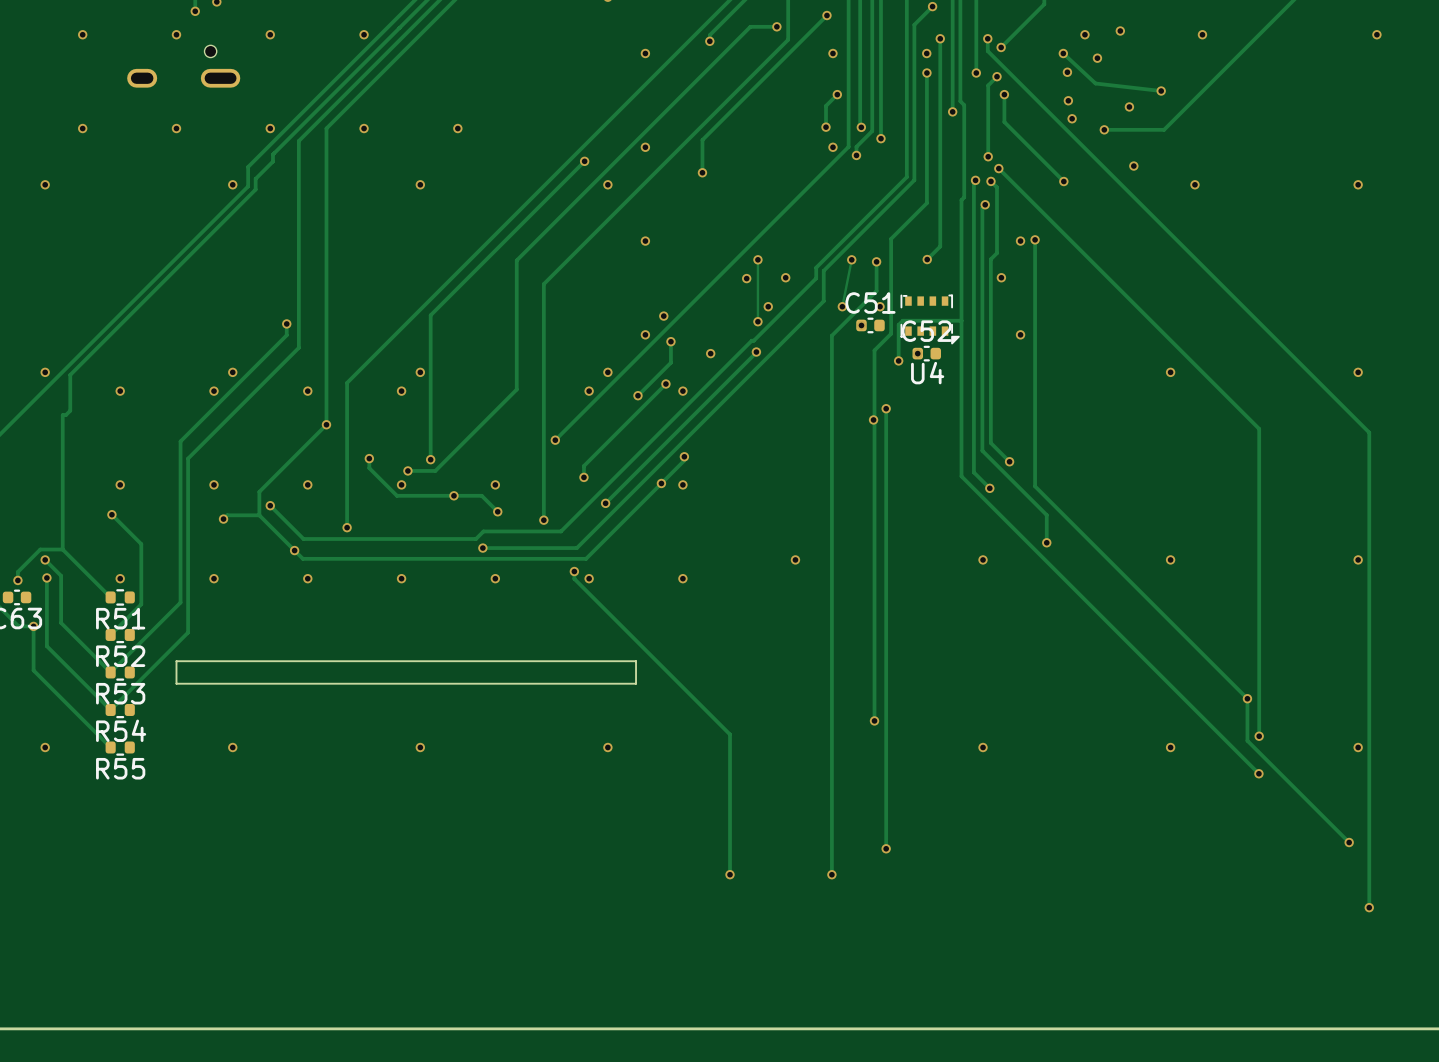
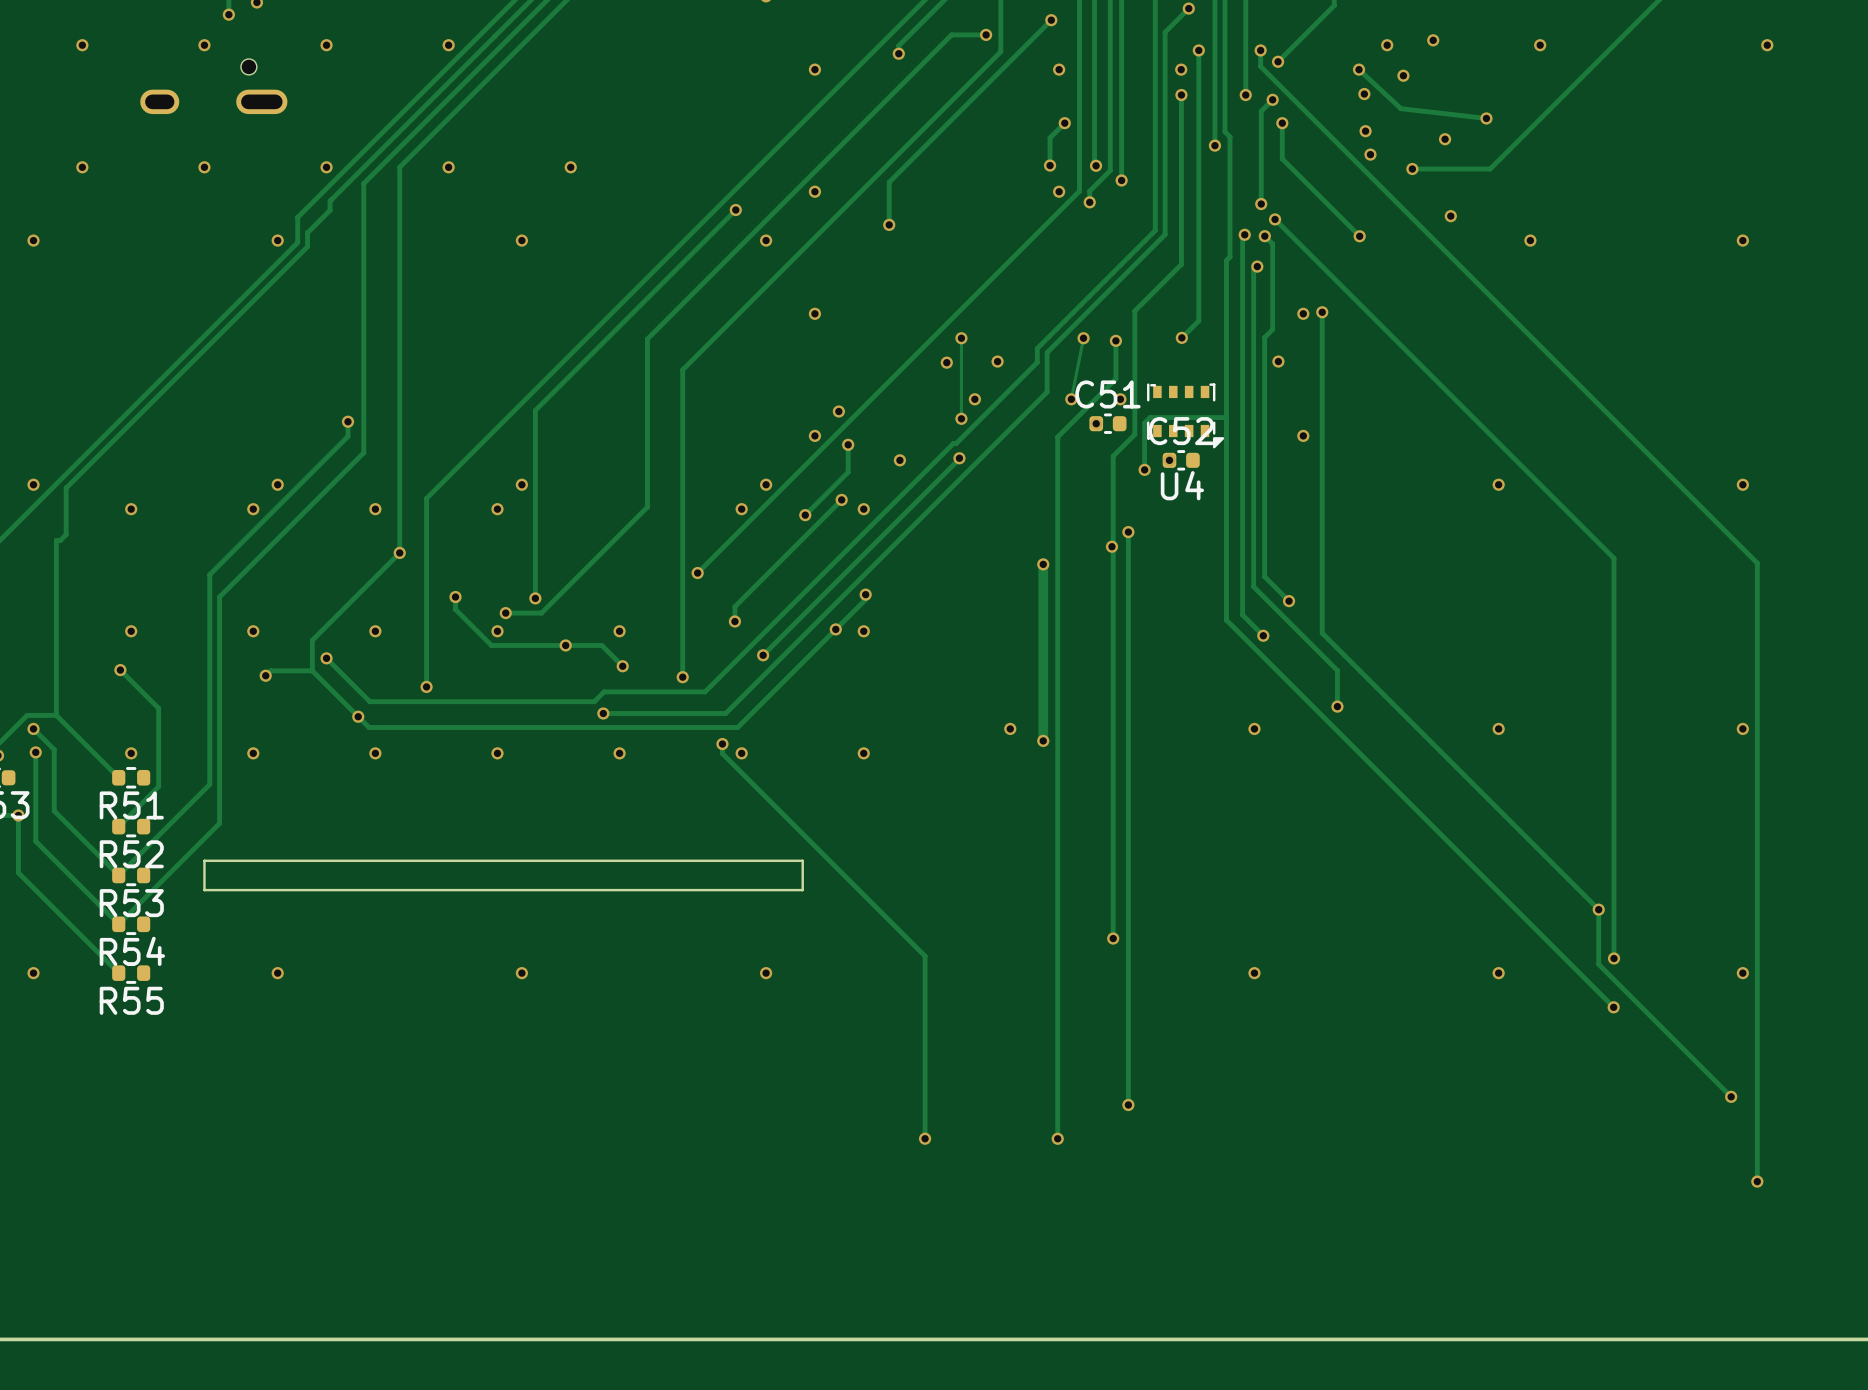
track: none -> (1043, 564) (1043, 740)
via: none -> (1043, 564)
via: none -> (1043, 740)

